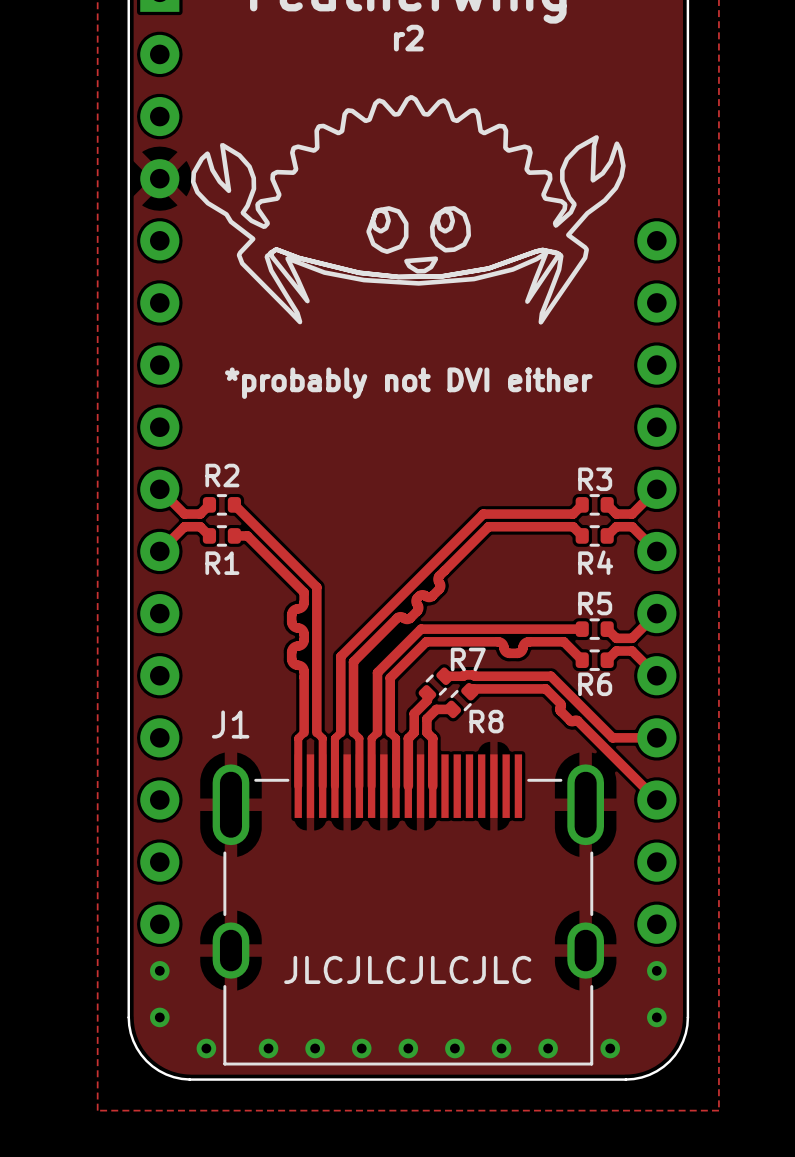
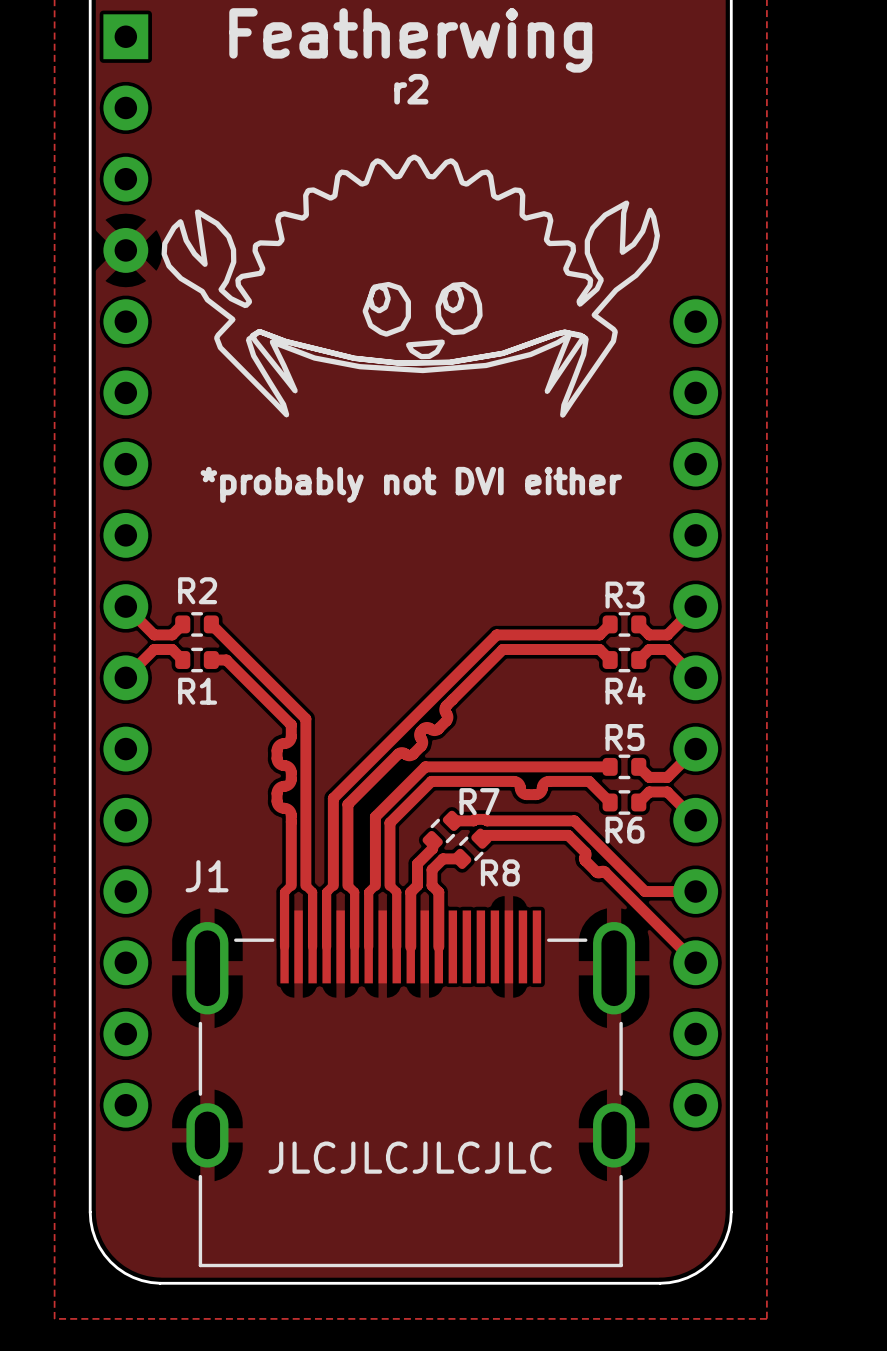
via: (159, 970) -> none
via: (656, 970) -> none
via: (159, 1017) -> none
via: (656, 1017) -> none
via: (206, 1048) -> none
via: (268, 1048) -> none
via: (315, 1048) -> none
via: (361, 1048) -> none
via: (408, 1048) -> none
via: (454, 1048) -> none
via: (501, 1048) -> none
via: (548, 1048) -> none
via: (610, 1048) -> none

